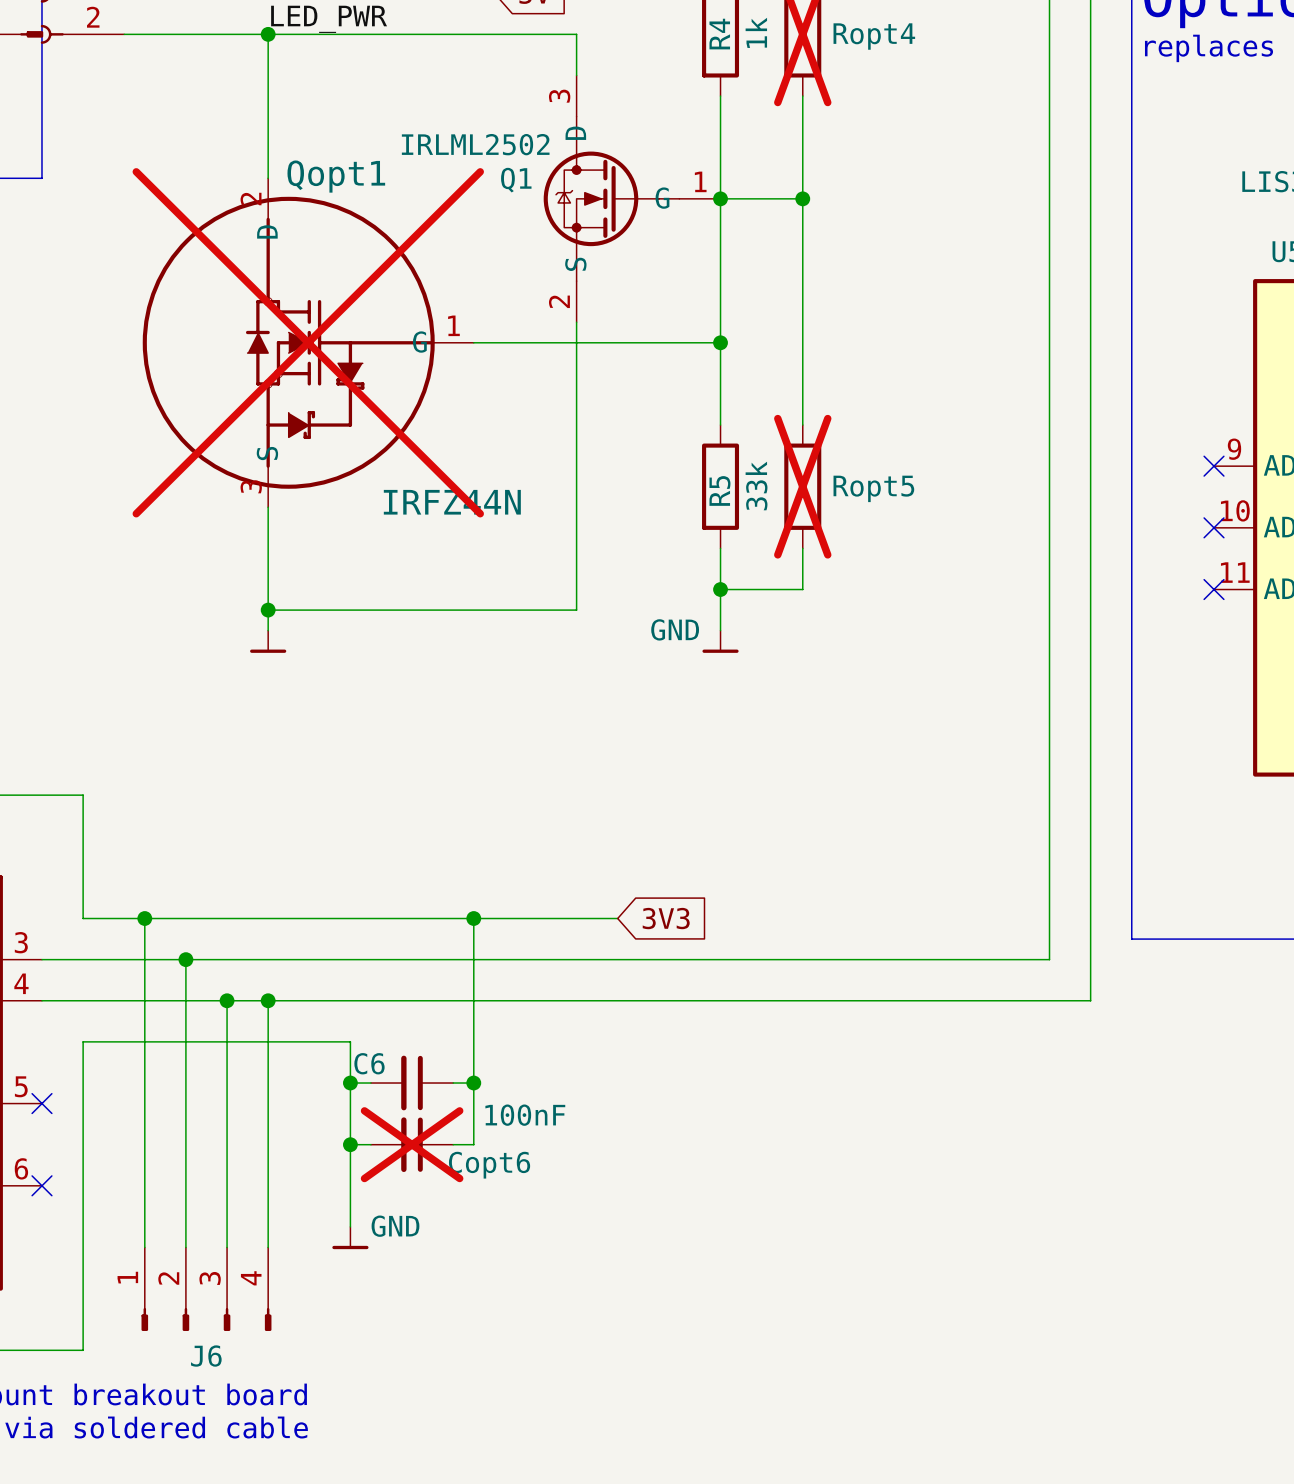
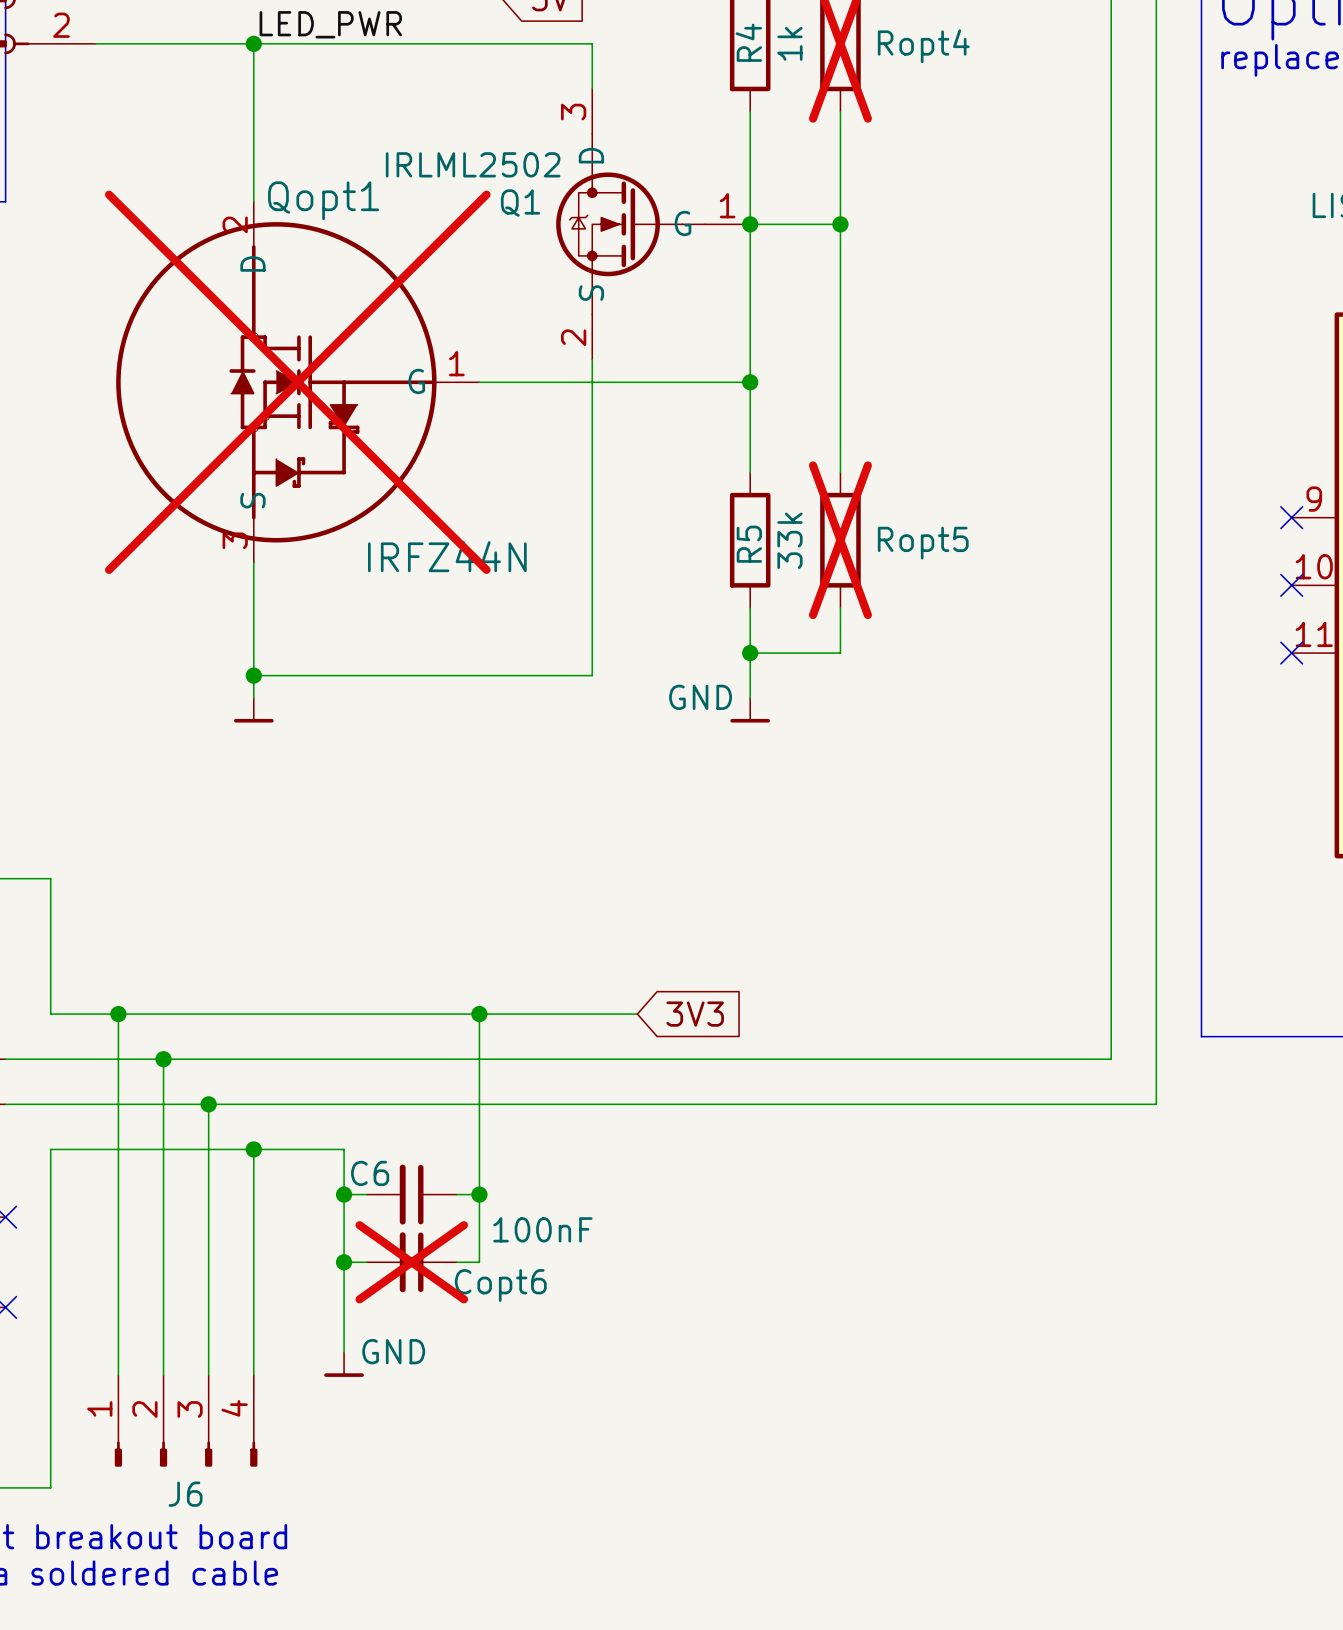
wire: (268, 1000) (268, 1041) -> none
junction position: (268, 1000) -> (253, 1149)

